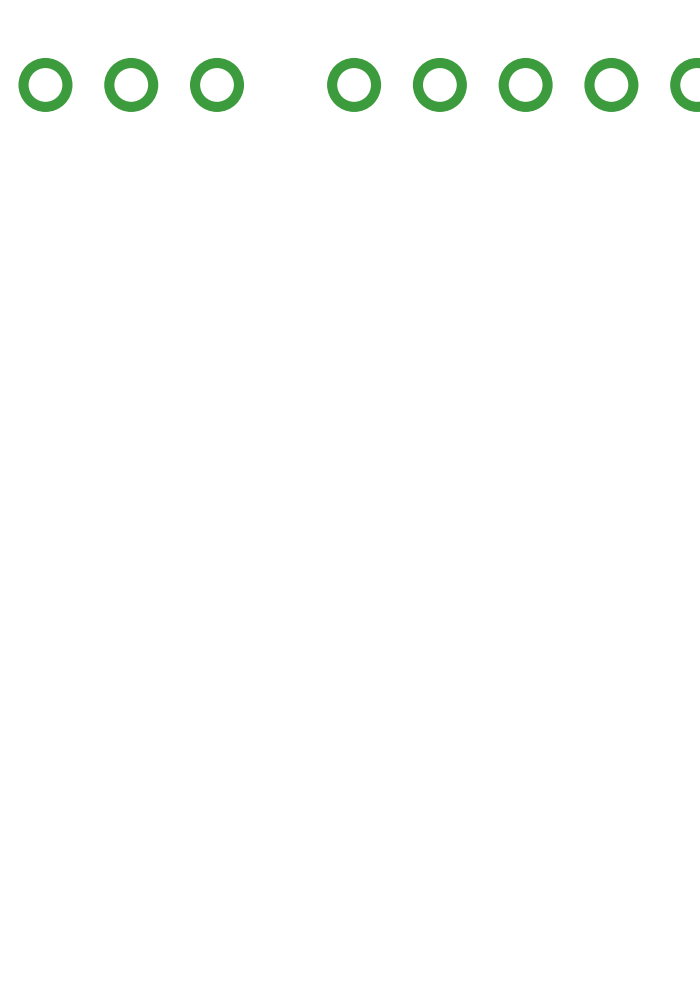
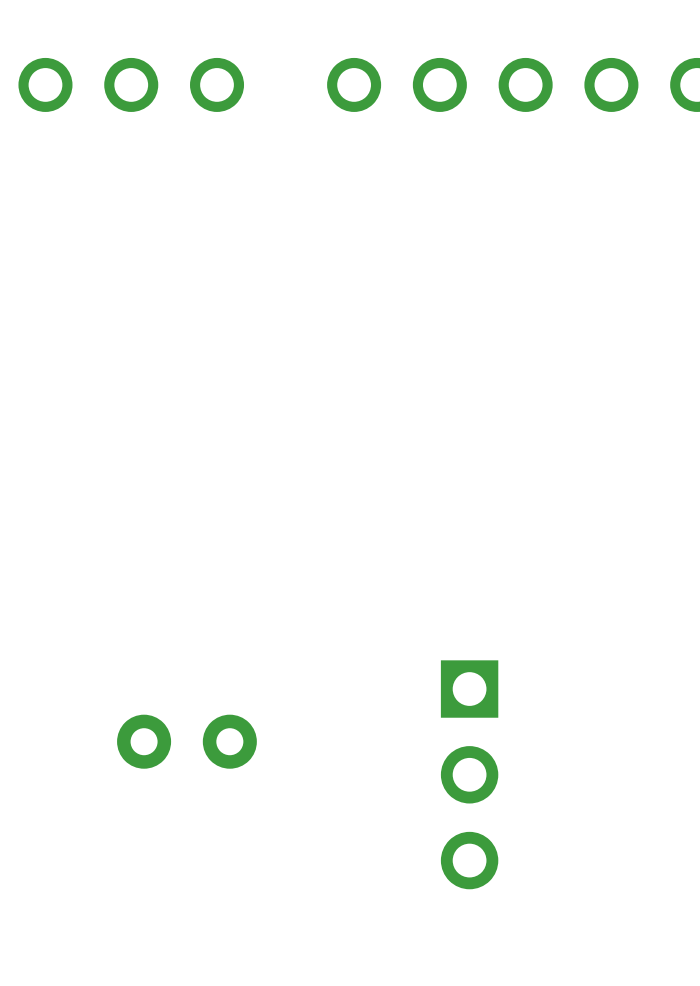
part: none -> (186, 741)
part: none -> (469, 774)

